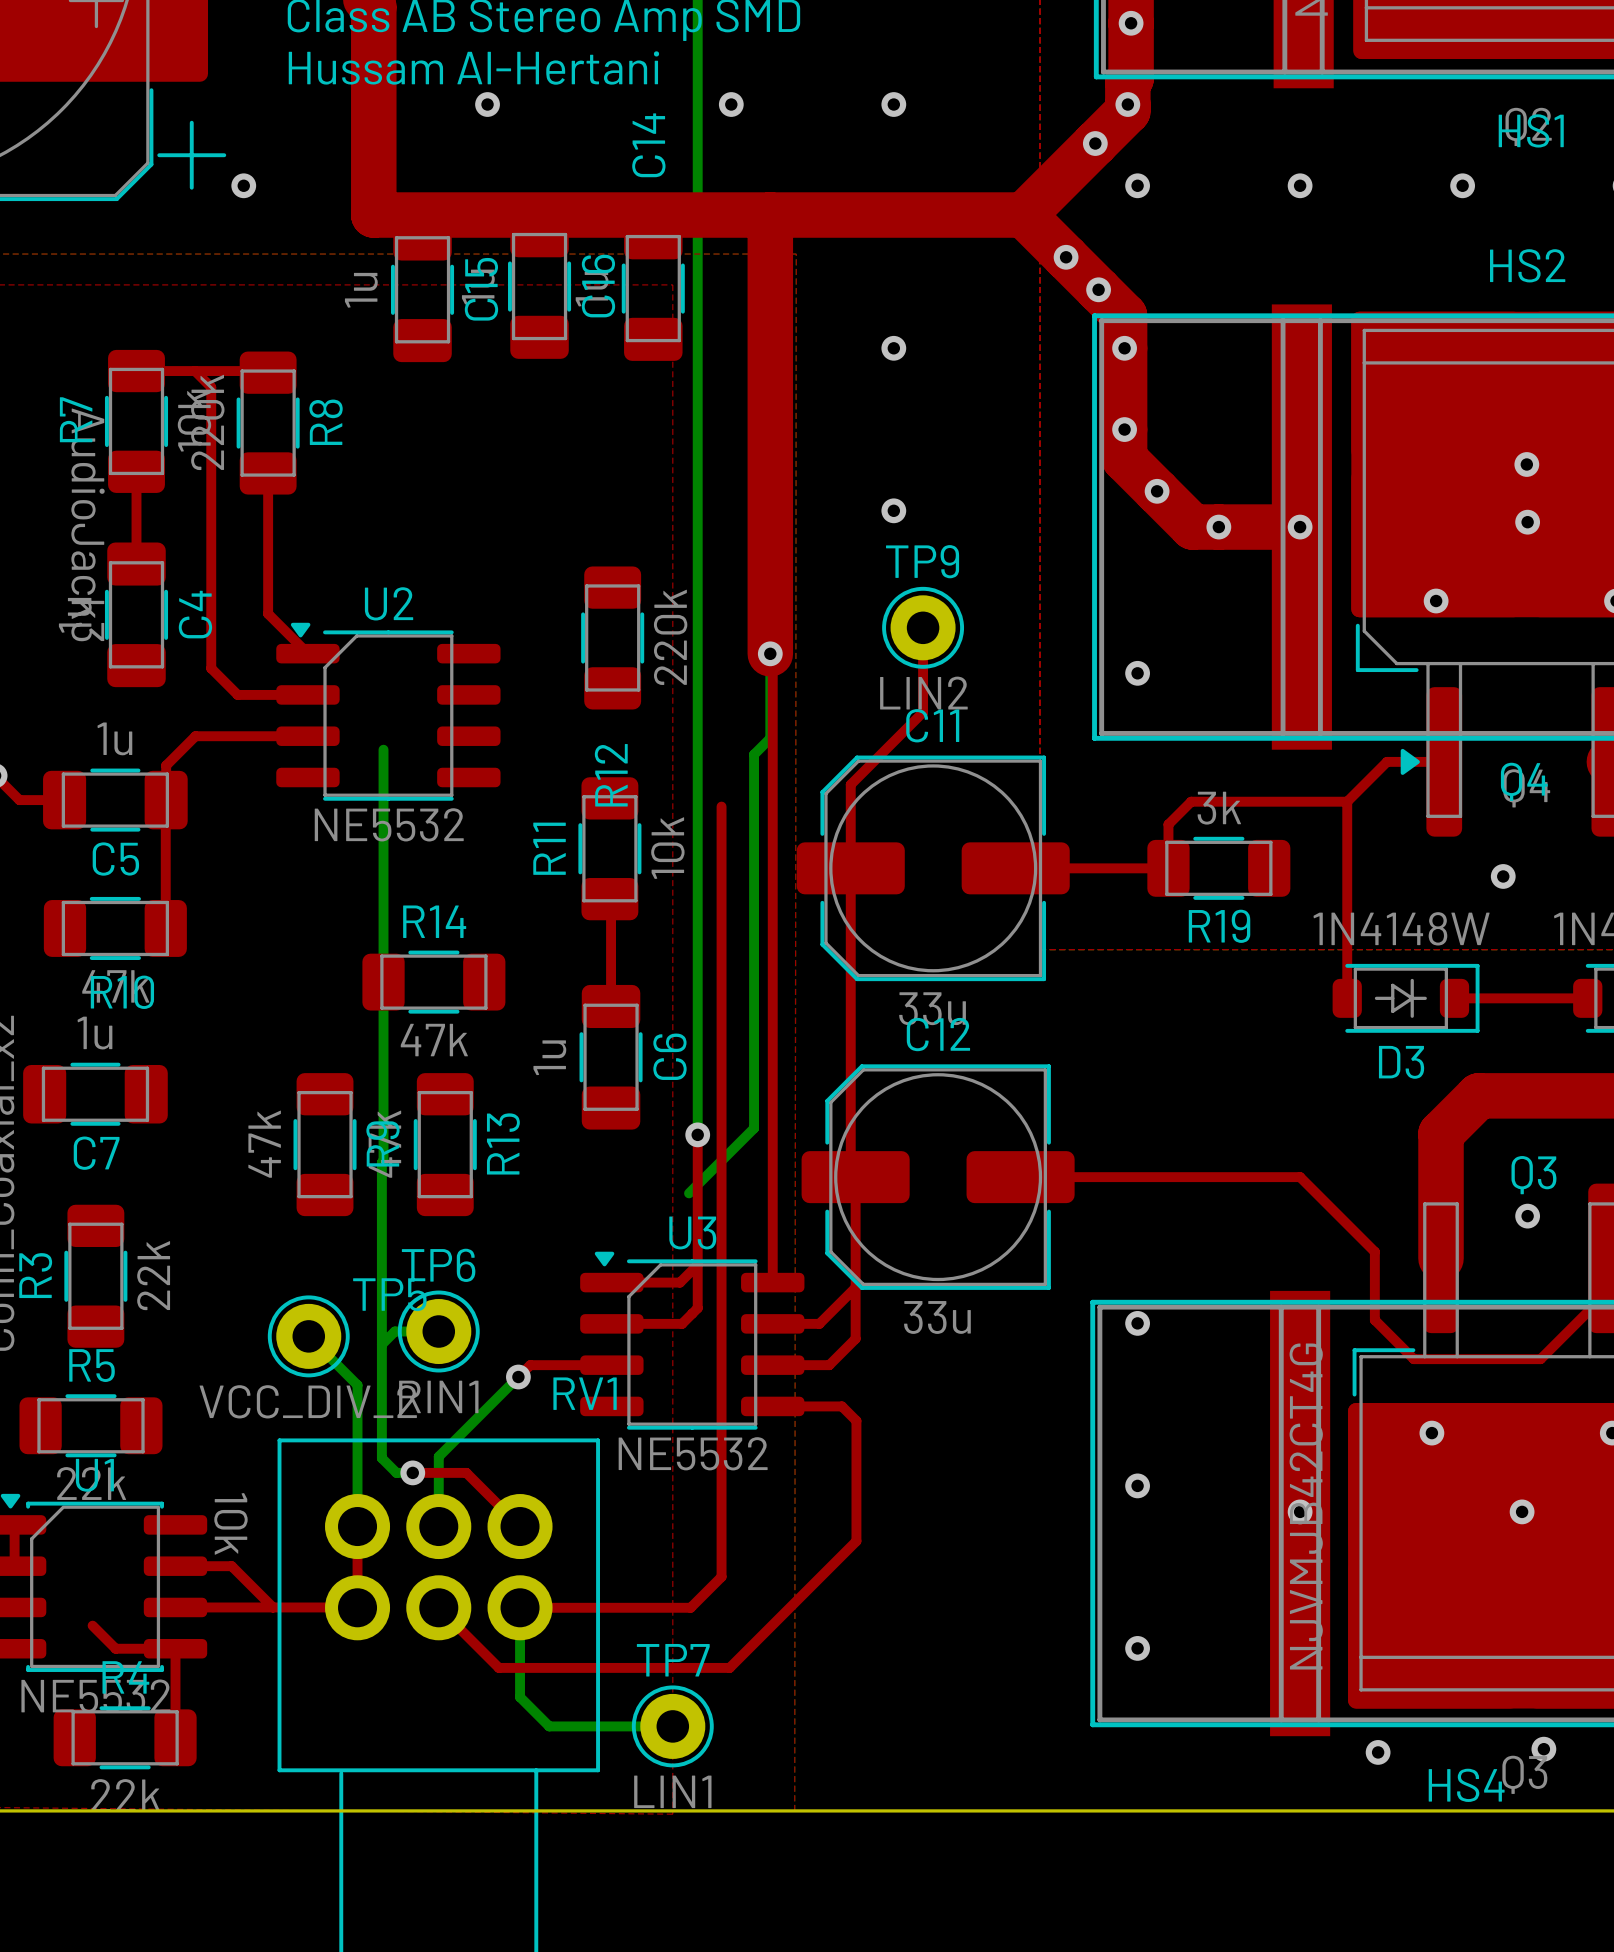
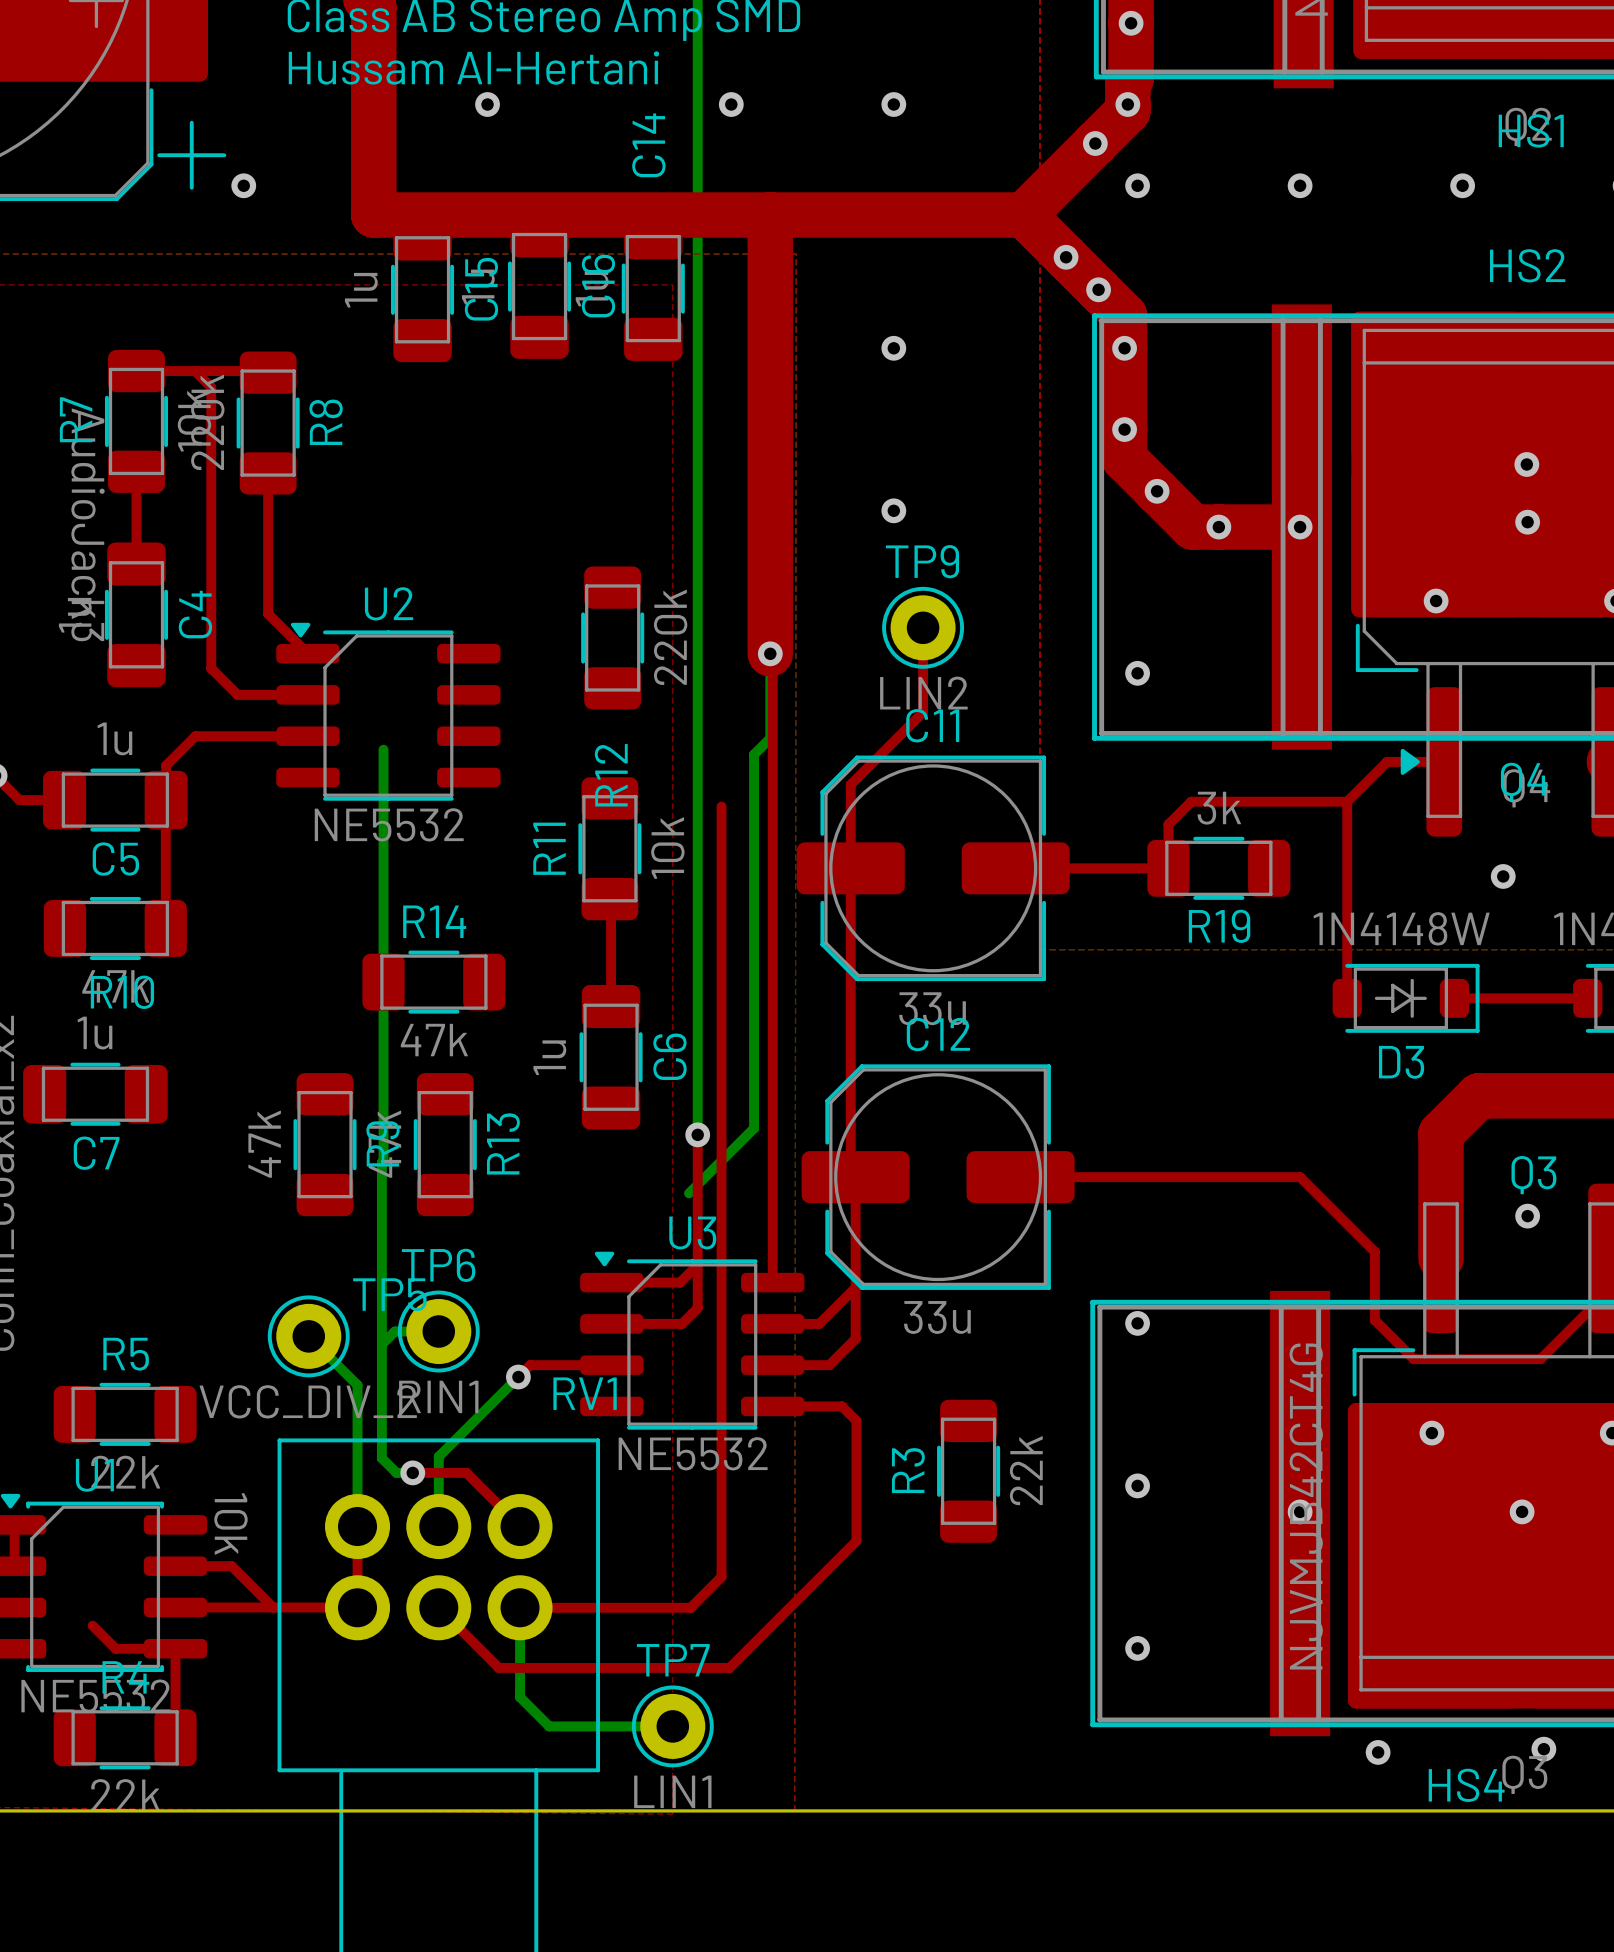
R3 position: (95, 1276) -> (968, 1471)
R5 position: (90, 1425) -> (125, 1414)

